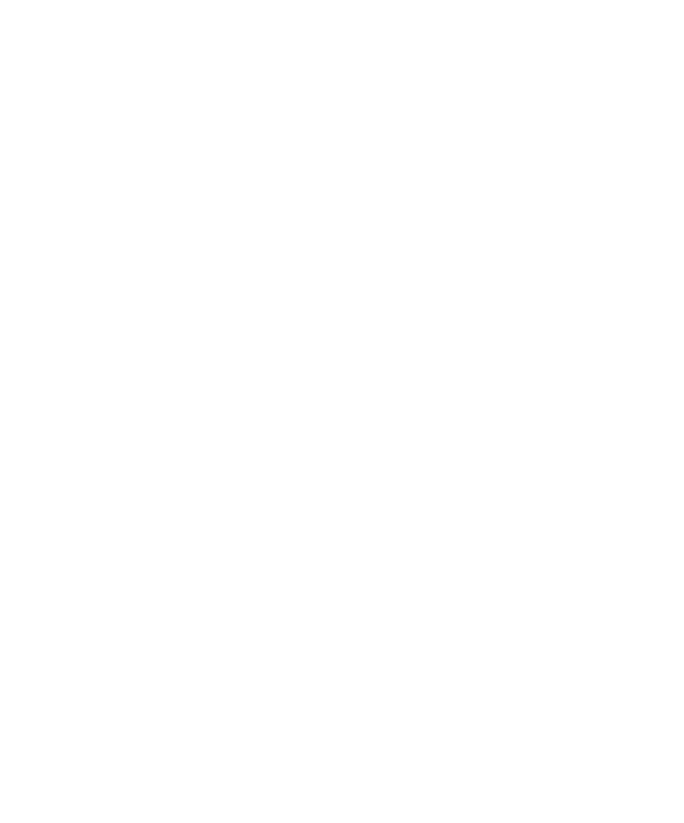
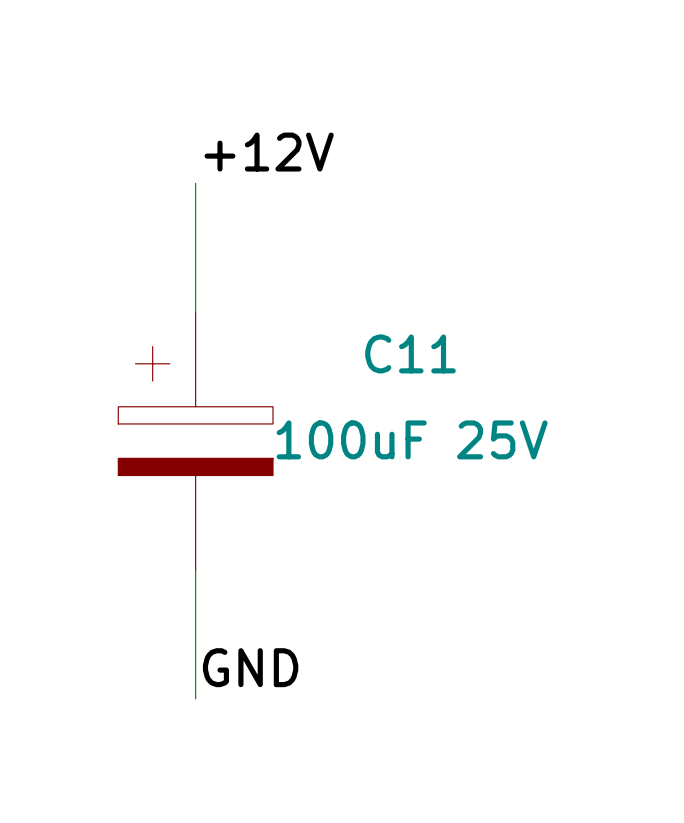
label: none -> +12V (269, 152)
wire: none -> (195, 183) (195, 312)
C11: none -> 100uF 25V (195, 441)
wire: none -> (195, 570) (195, 698)
label: none -> GND (250, 667)

